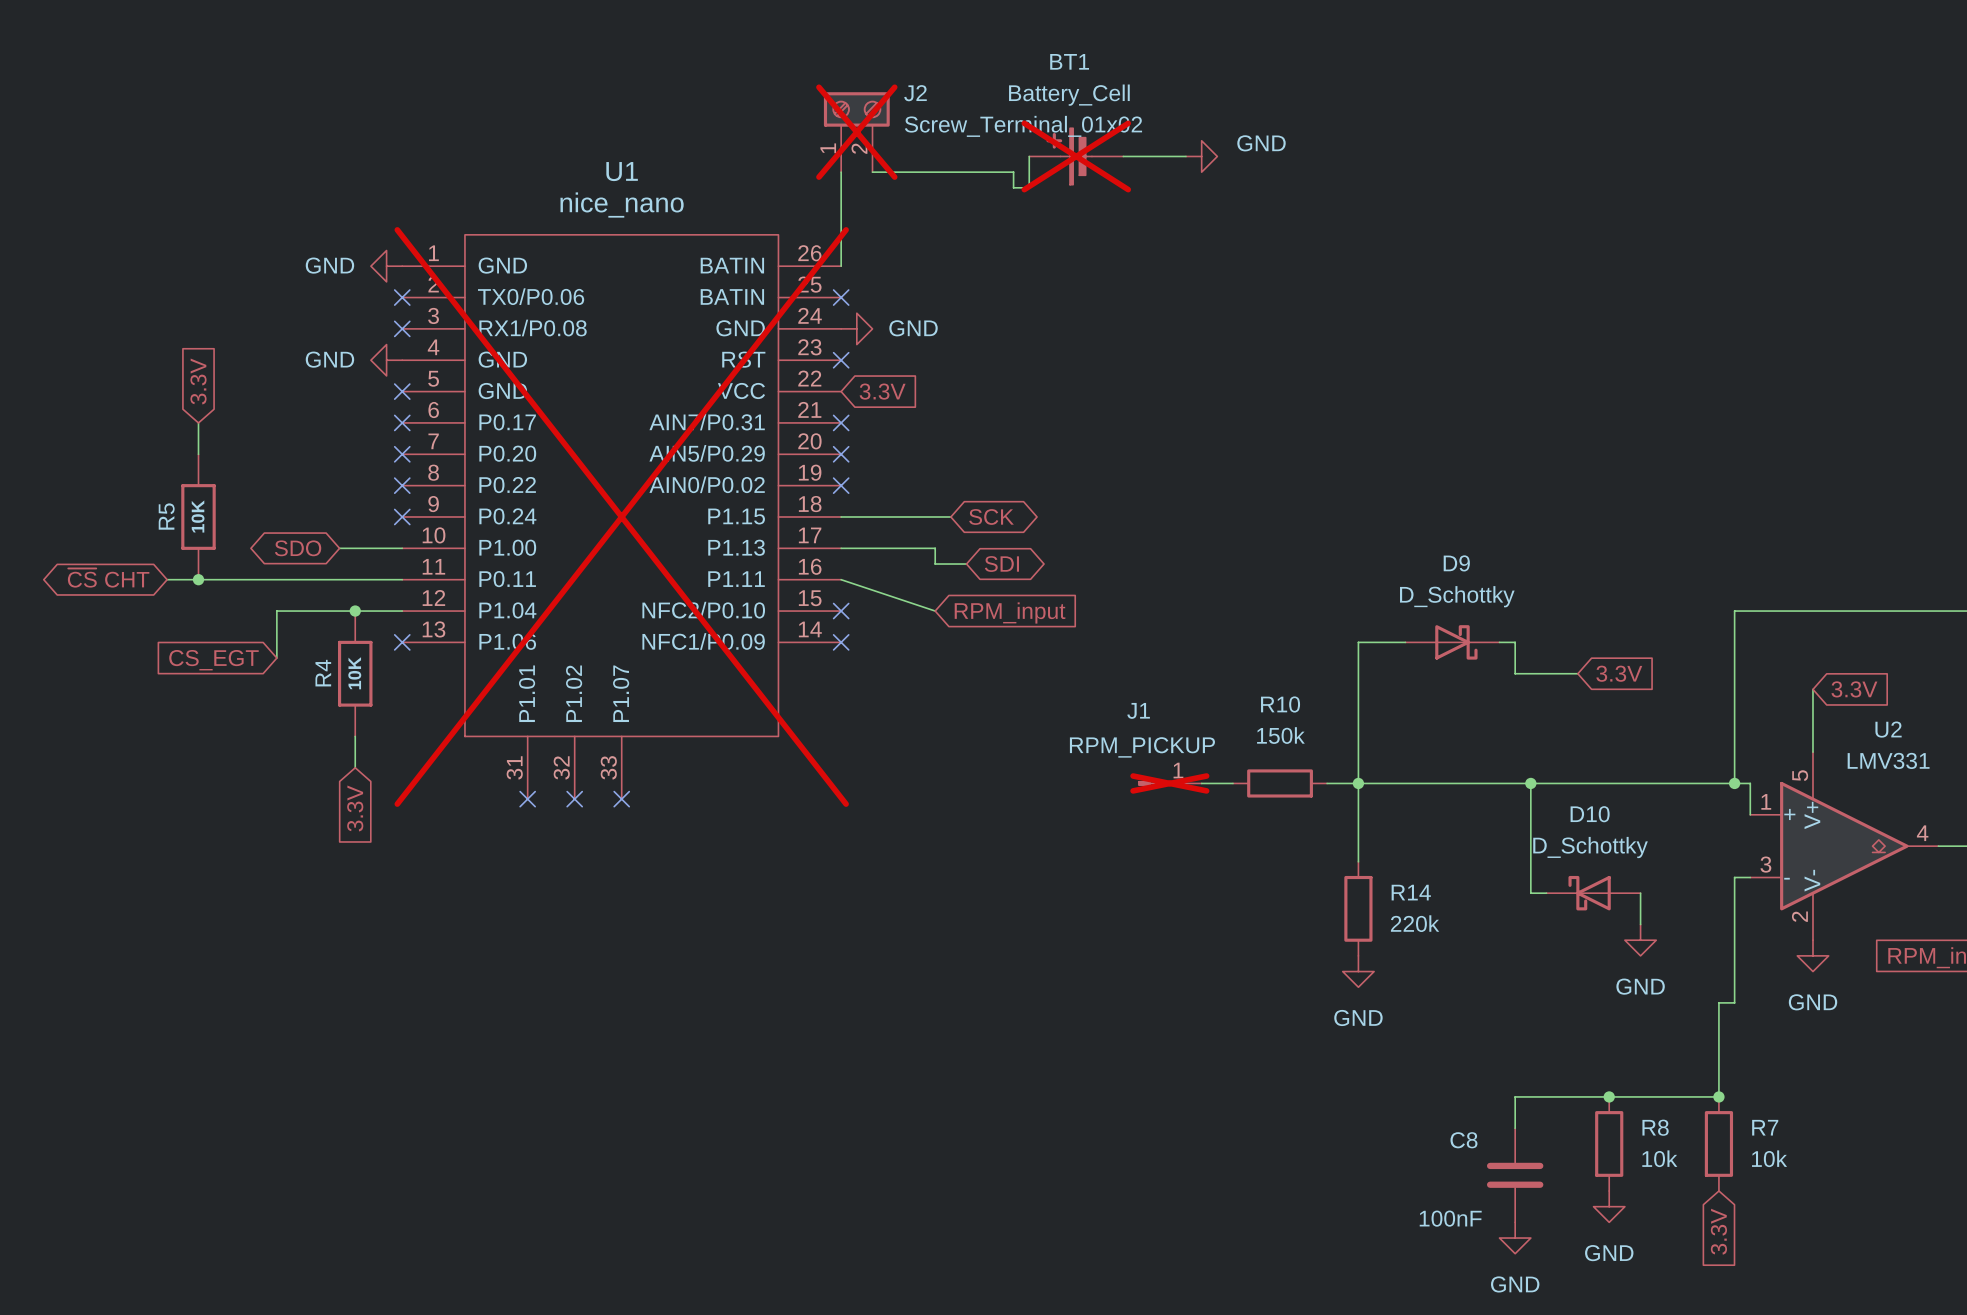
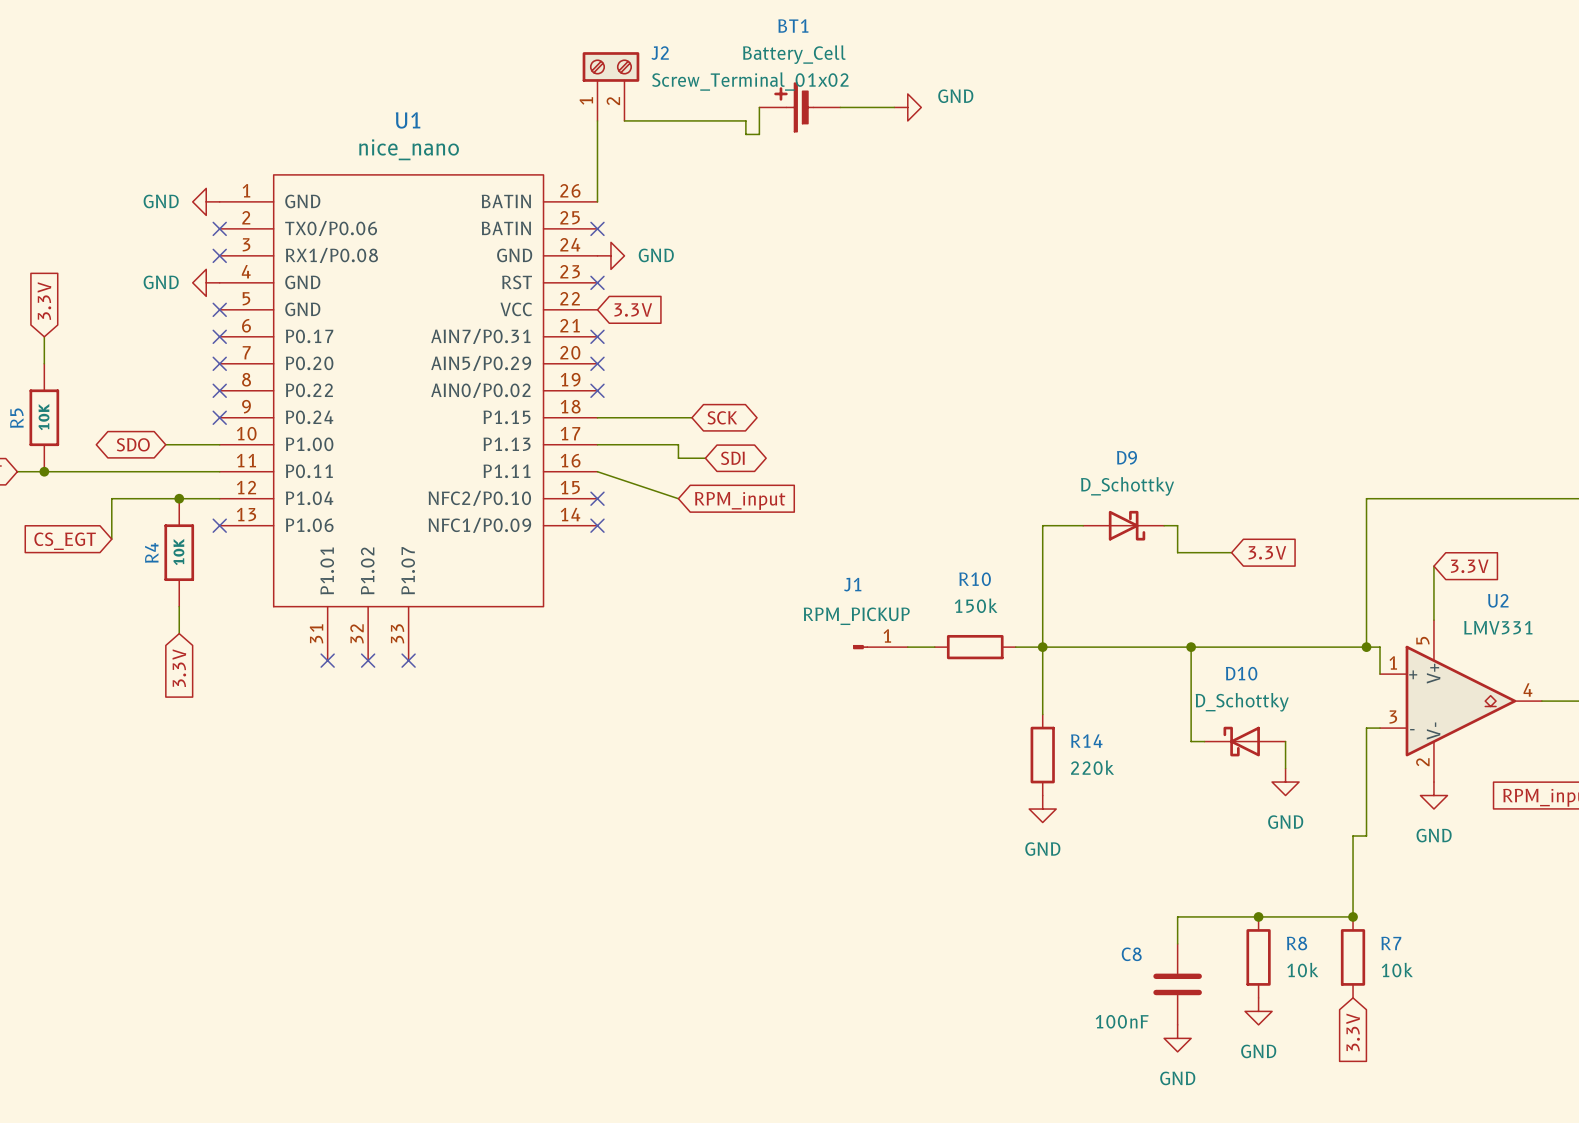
J2 do-not-place cross: (856, 132) -> none
BT1 do-not-place cross: (1076, 156) -> none
U1 do-not-place cross: (621, 516) -> none
J1 do-not-place cross: (1169, 783) -> none

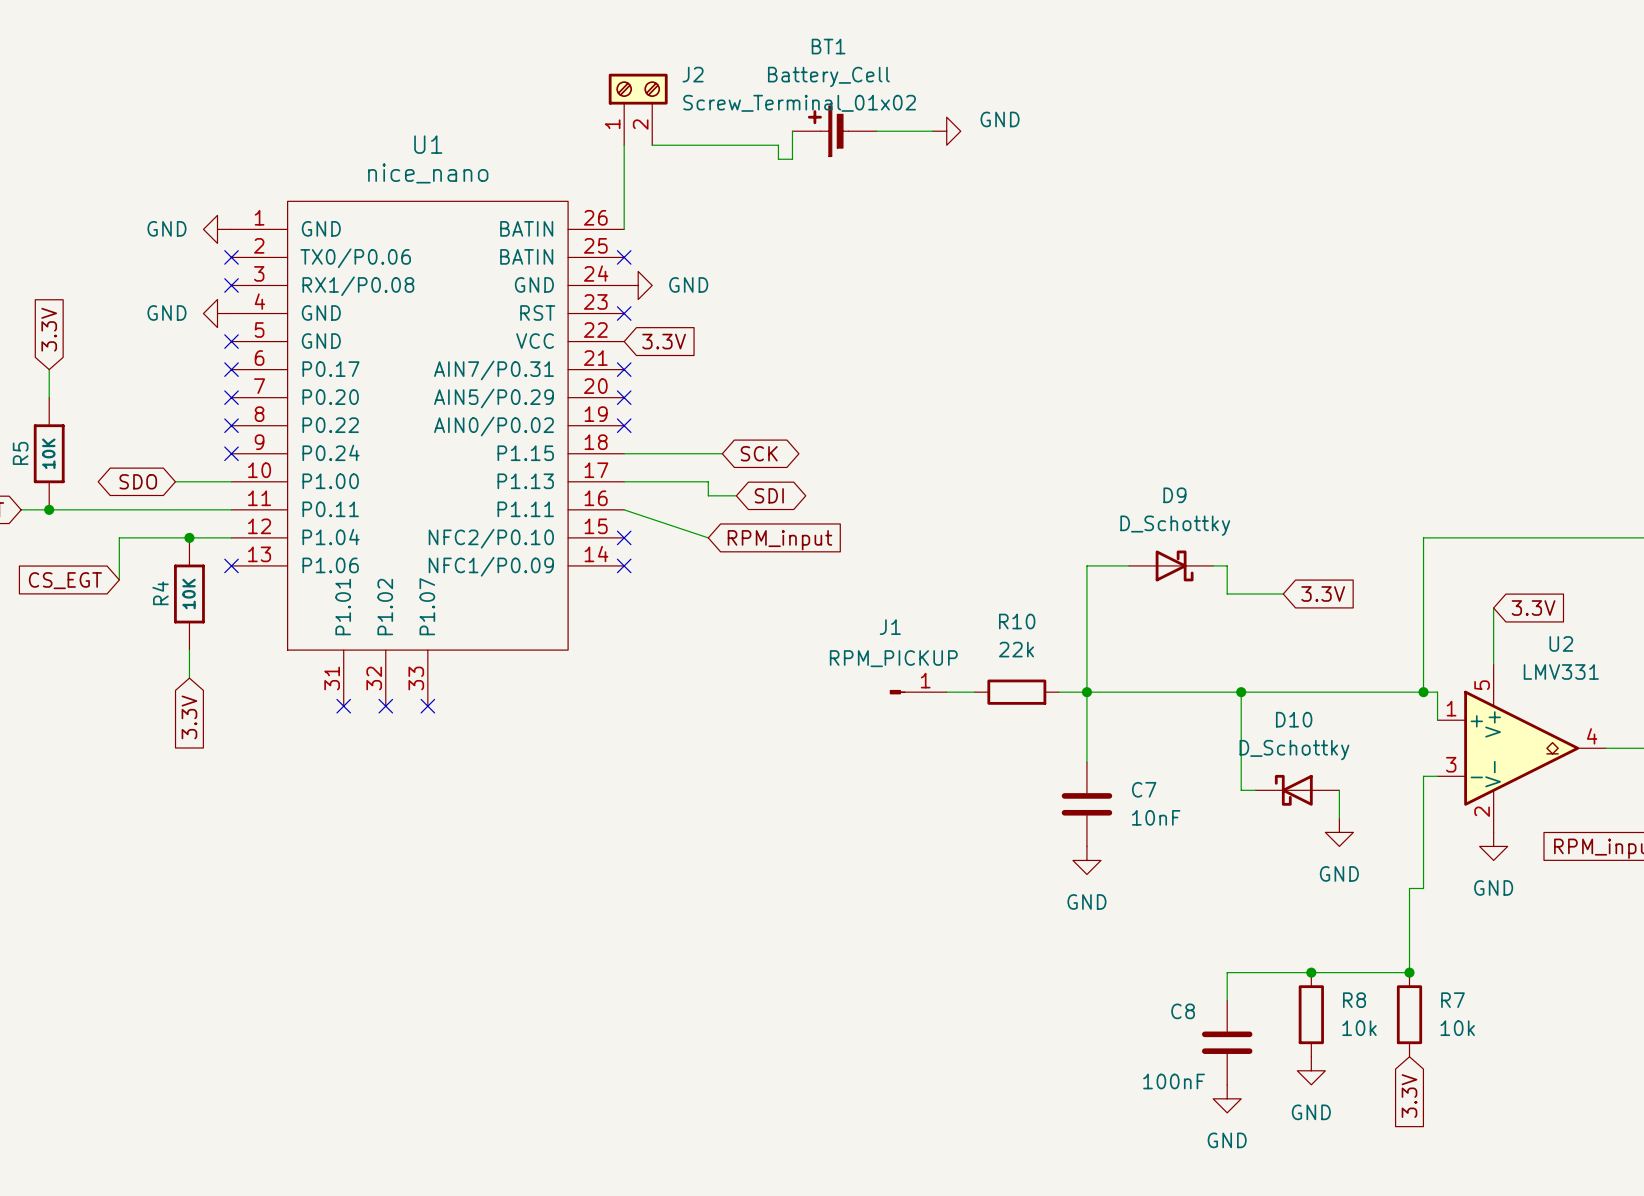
R10 value: 150k (976, 605) -> 22k (1016, 649)
R14: 220k (1042, 755) -> none
C7: none -> 10nF (1086, 804)

